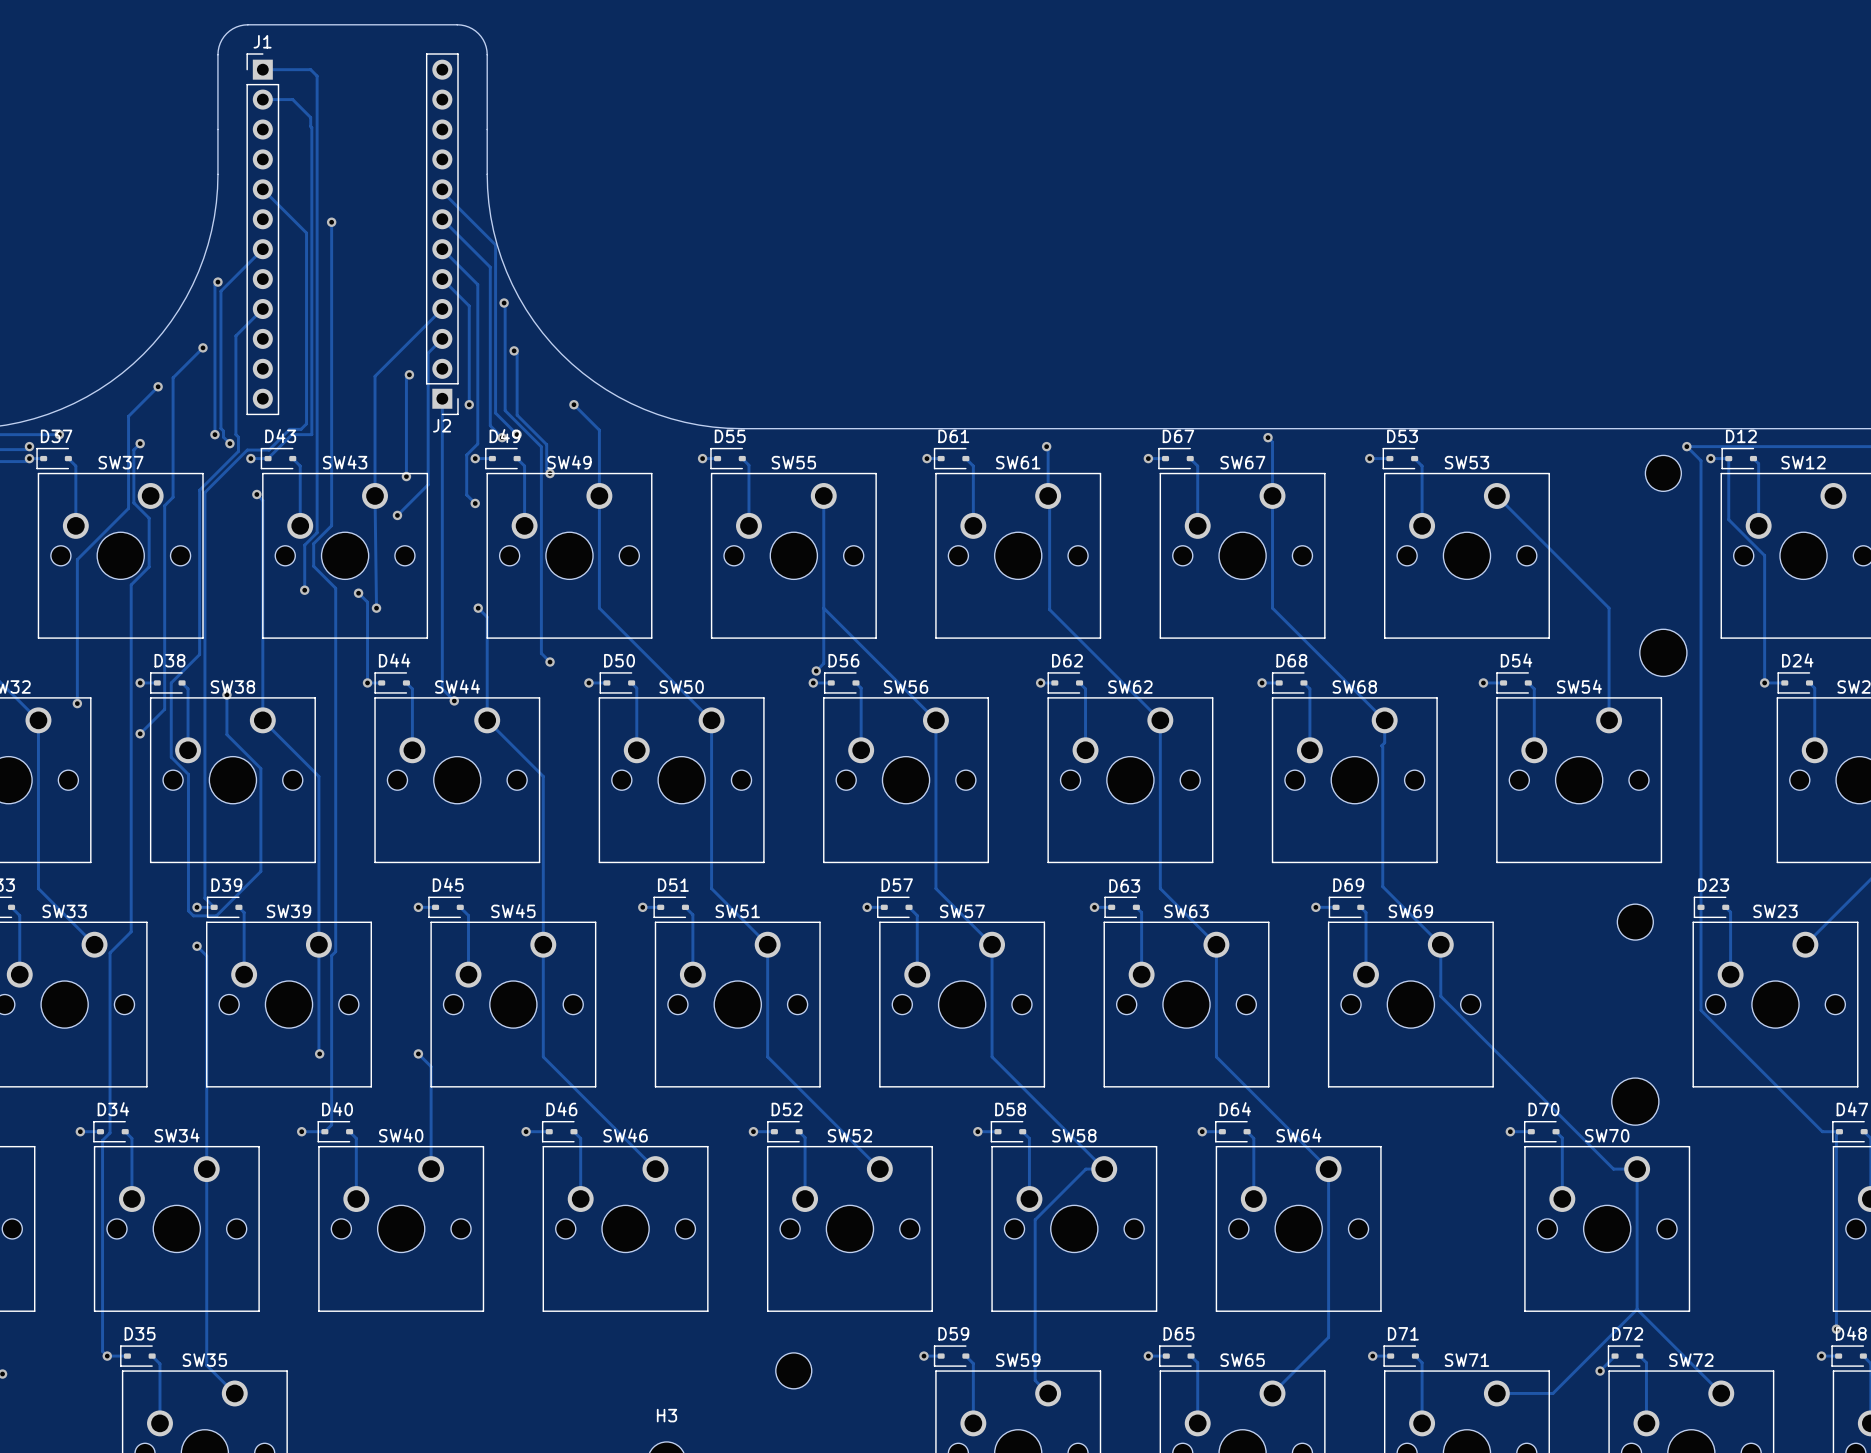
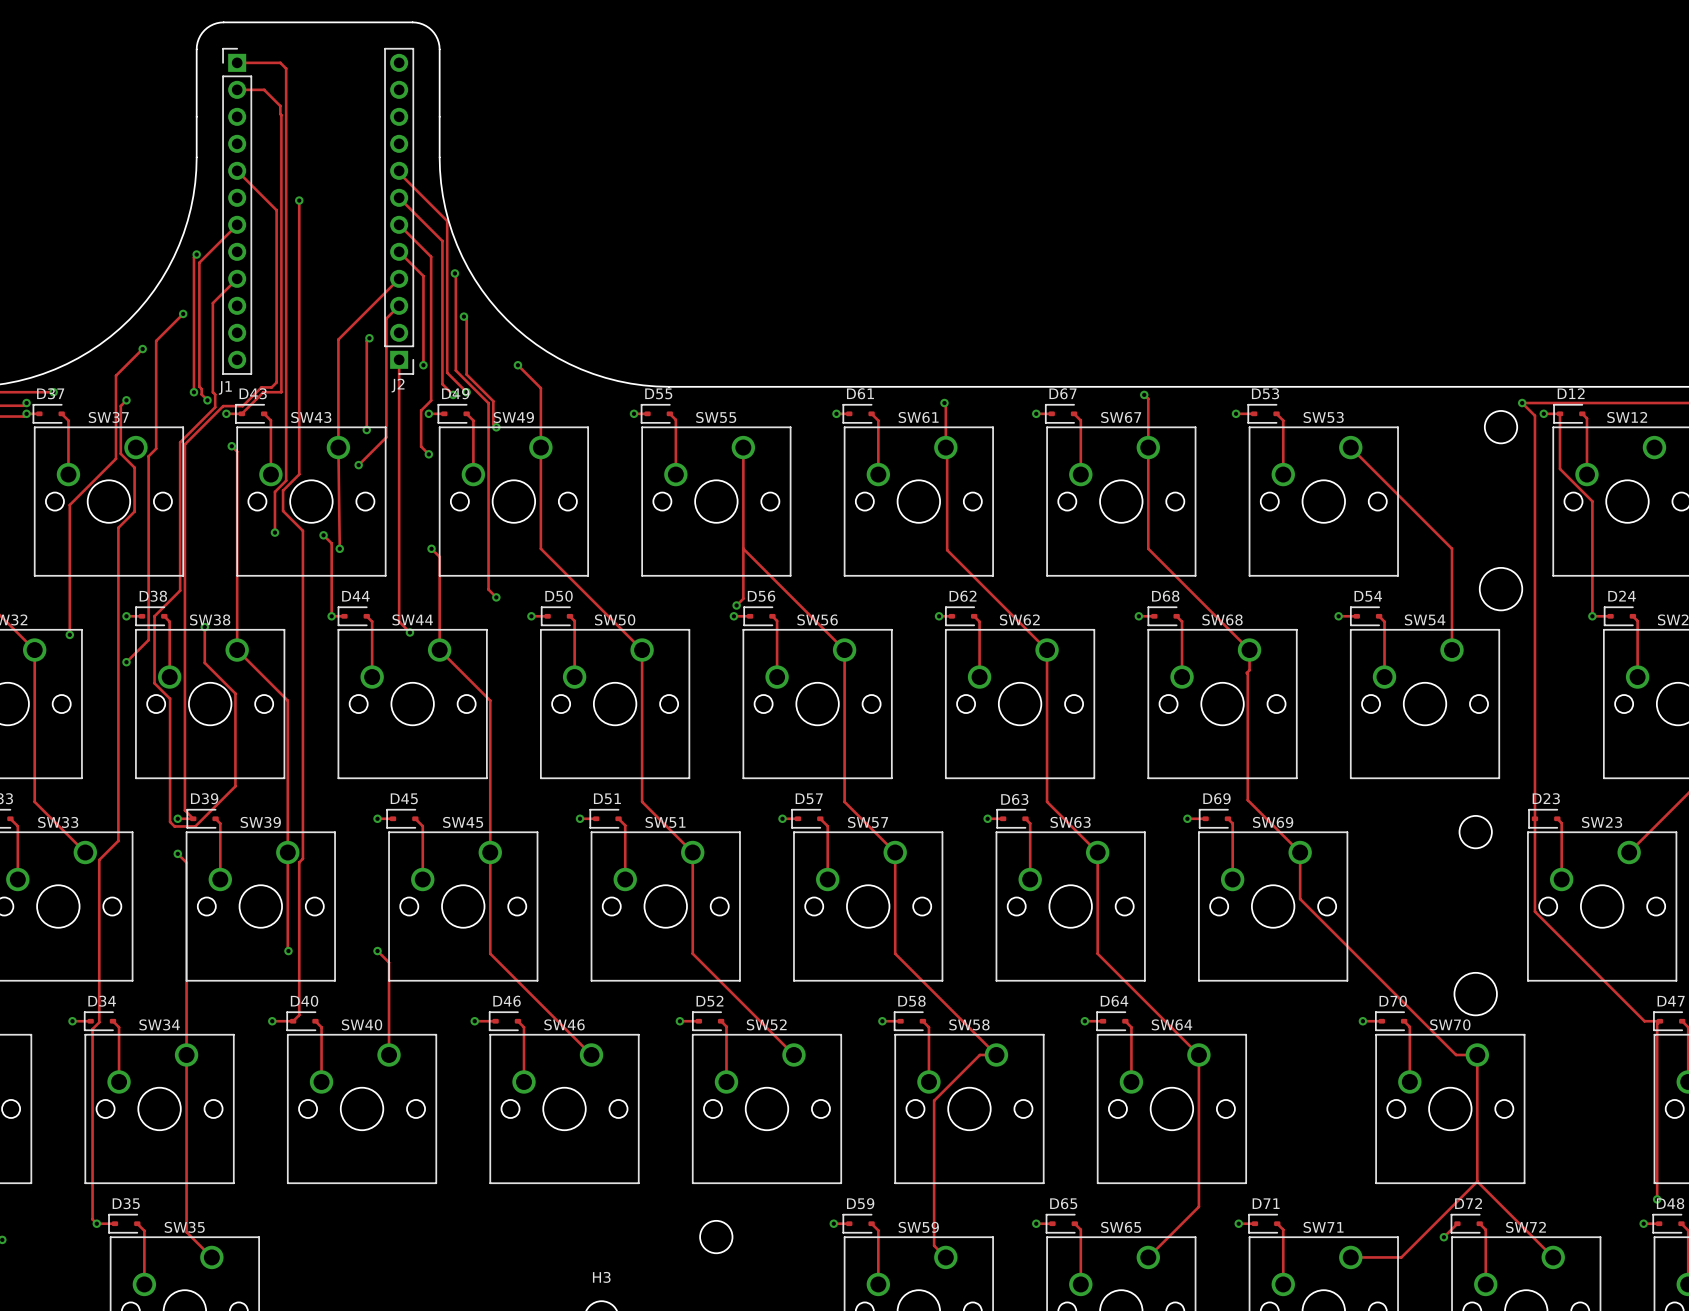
J1 name position: J1 (262, 41) -> J1 (225, 387)

